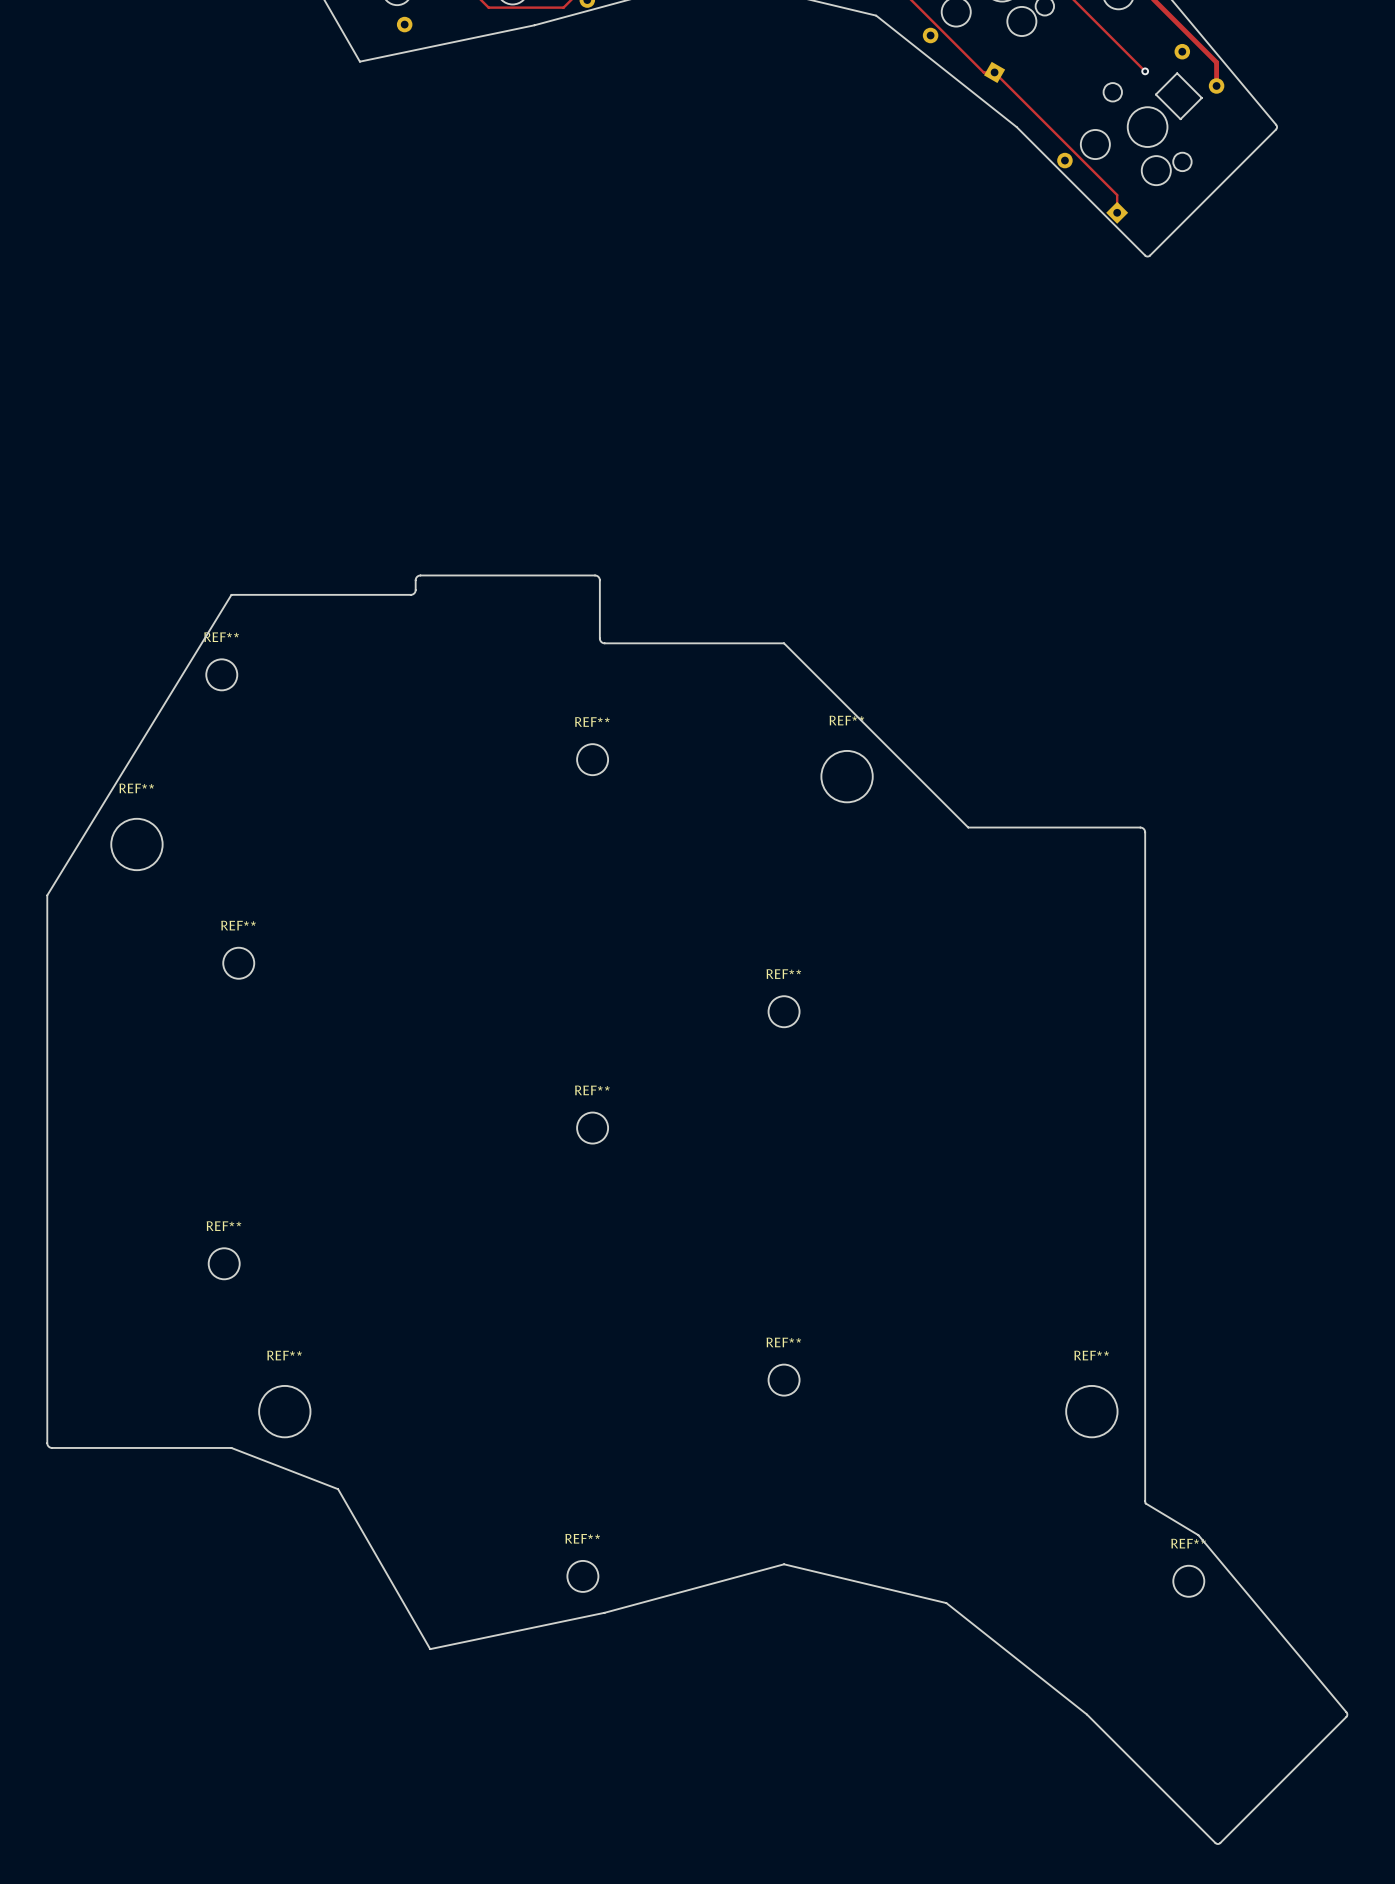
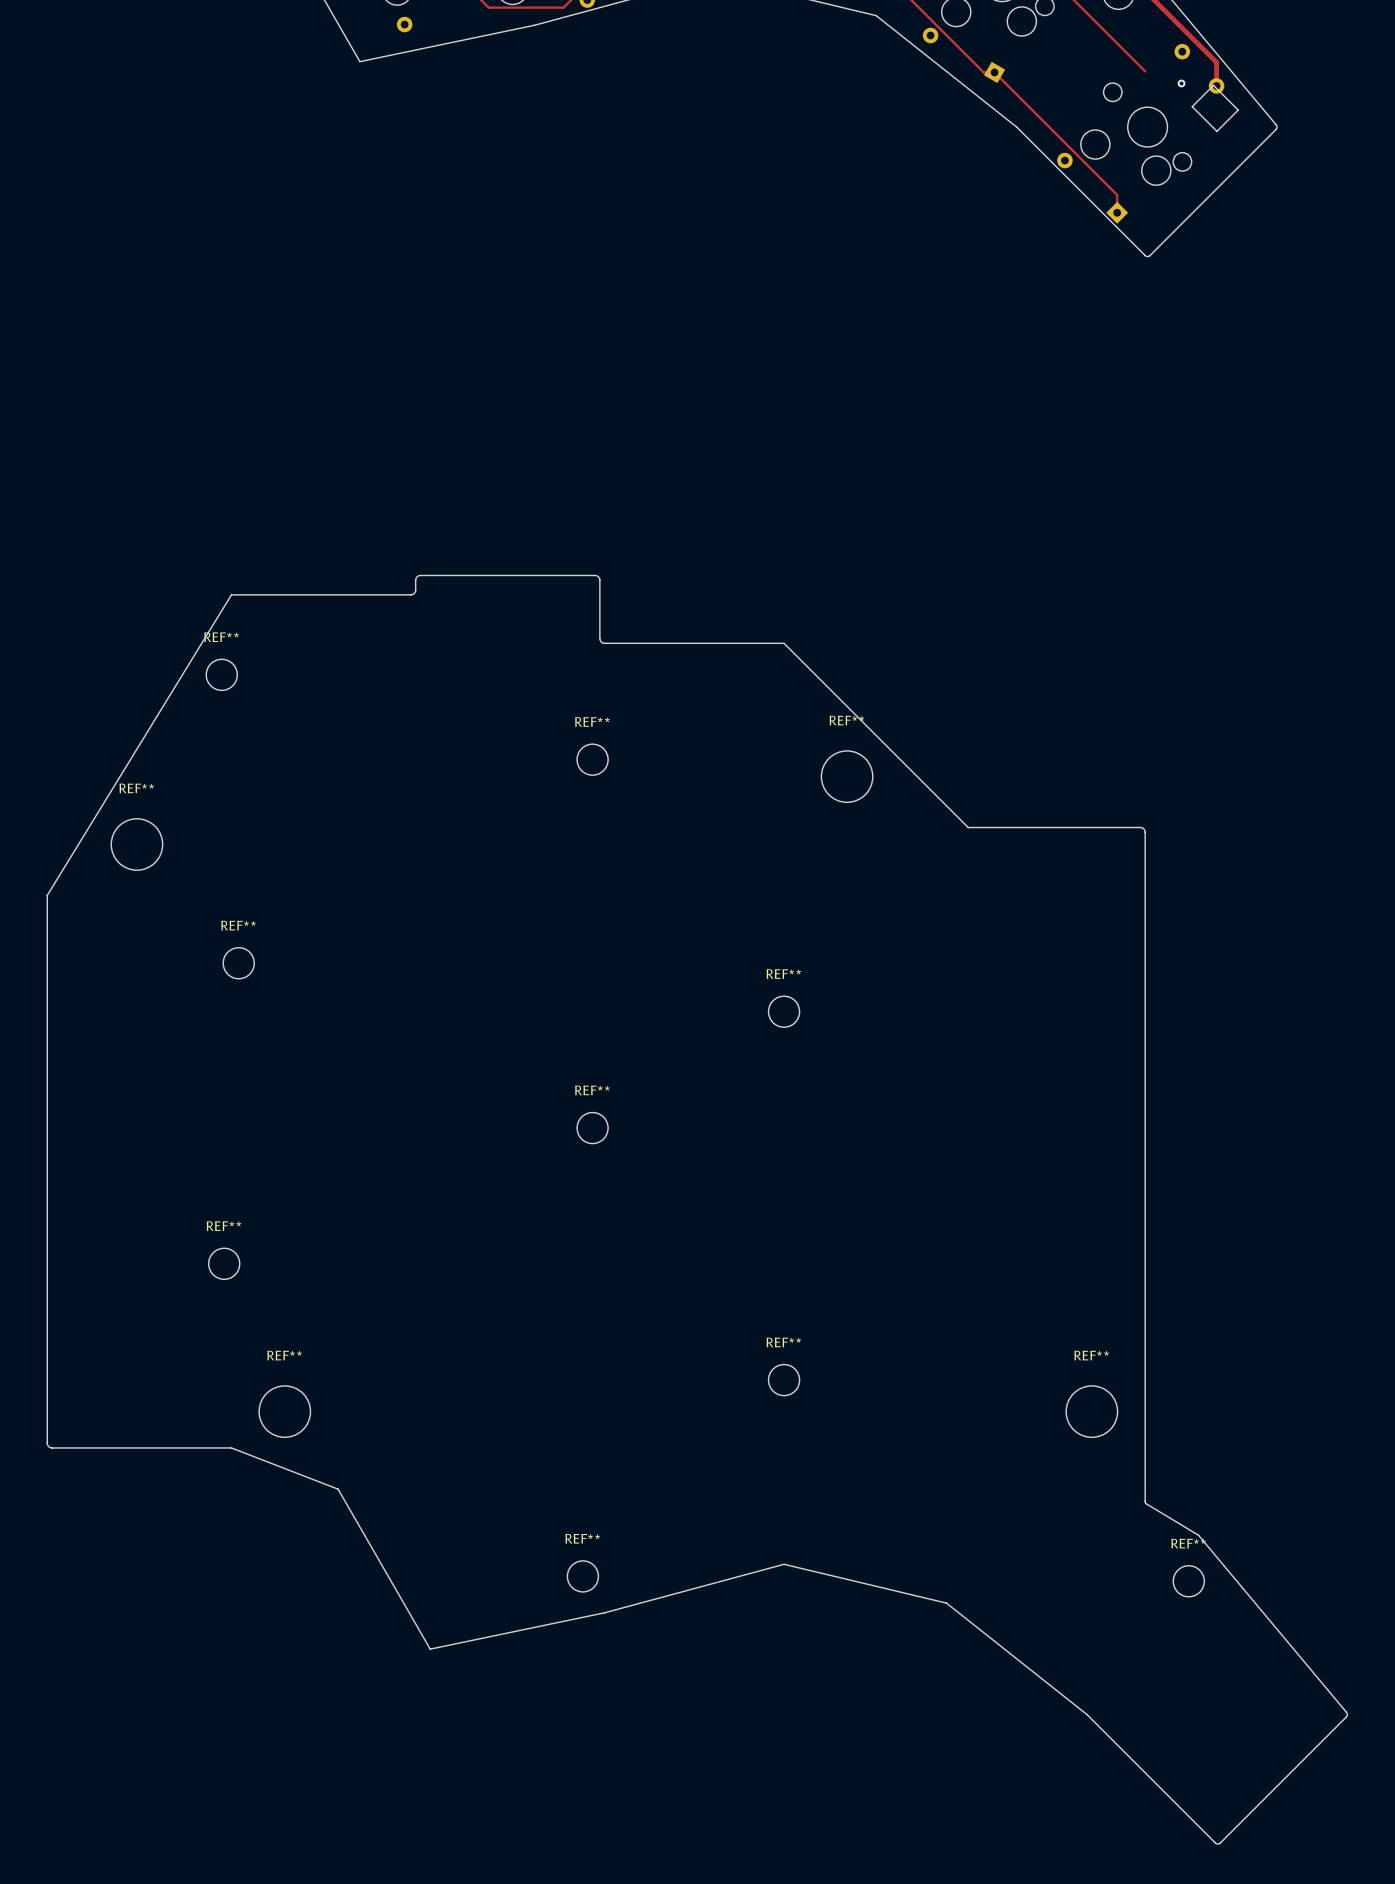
via position: (1145, 71) -> (1181, 83)
part position: (1178, 96) -> (1215, 108)

